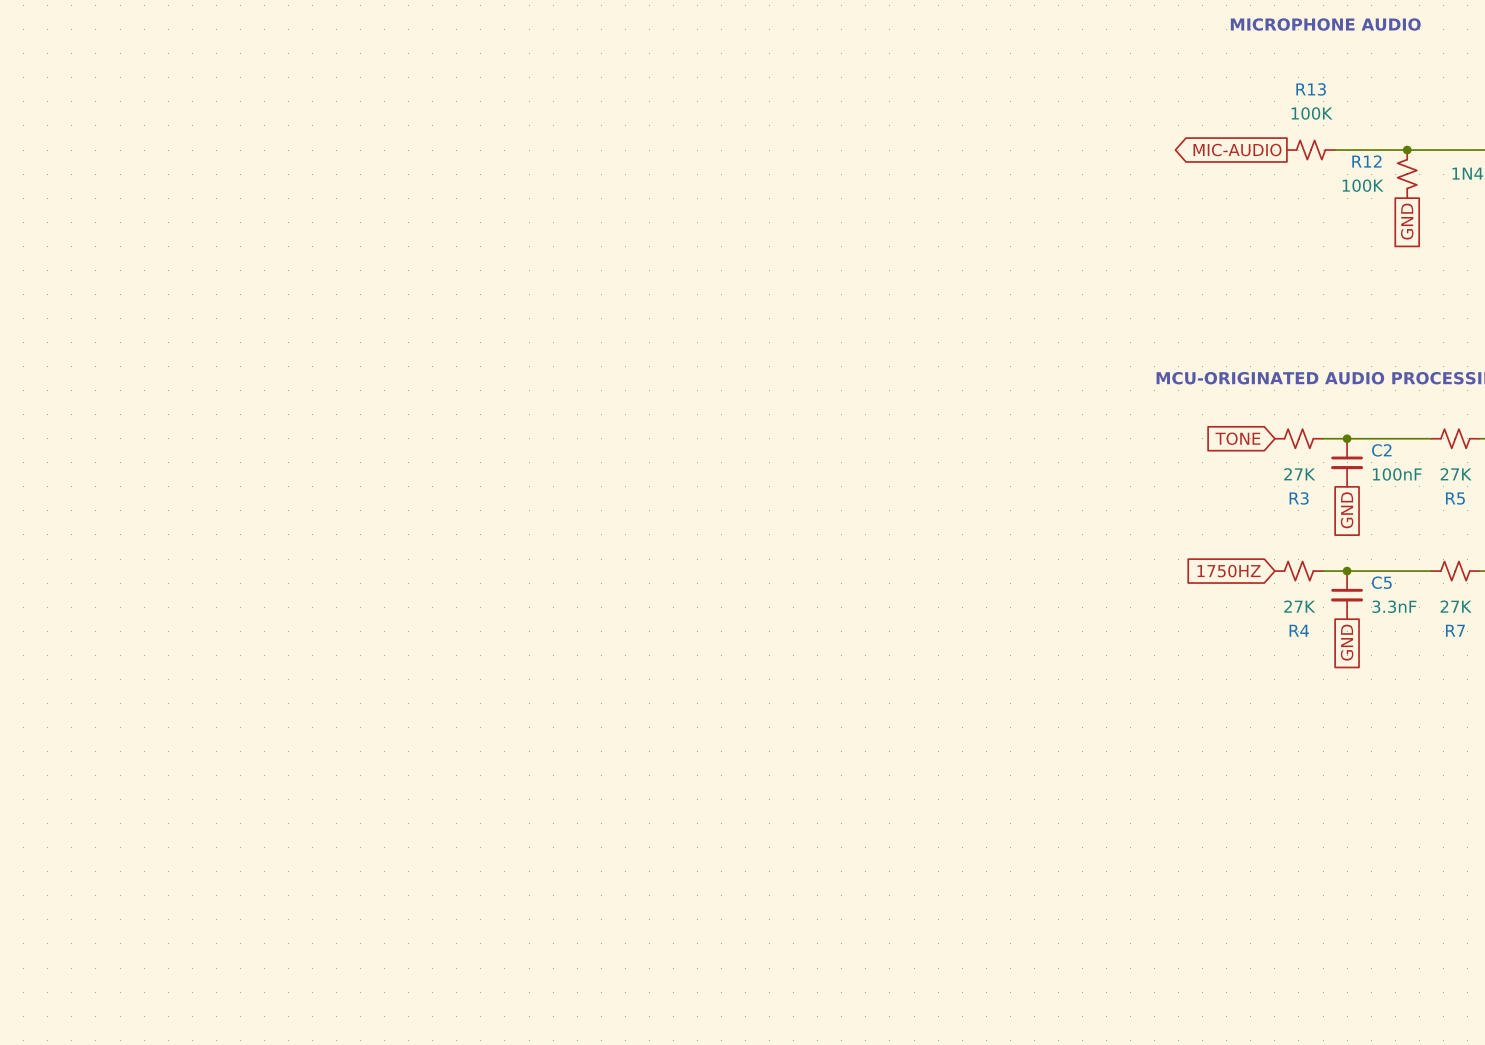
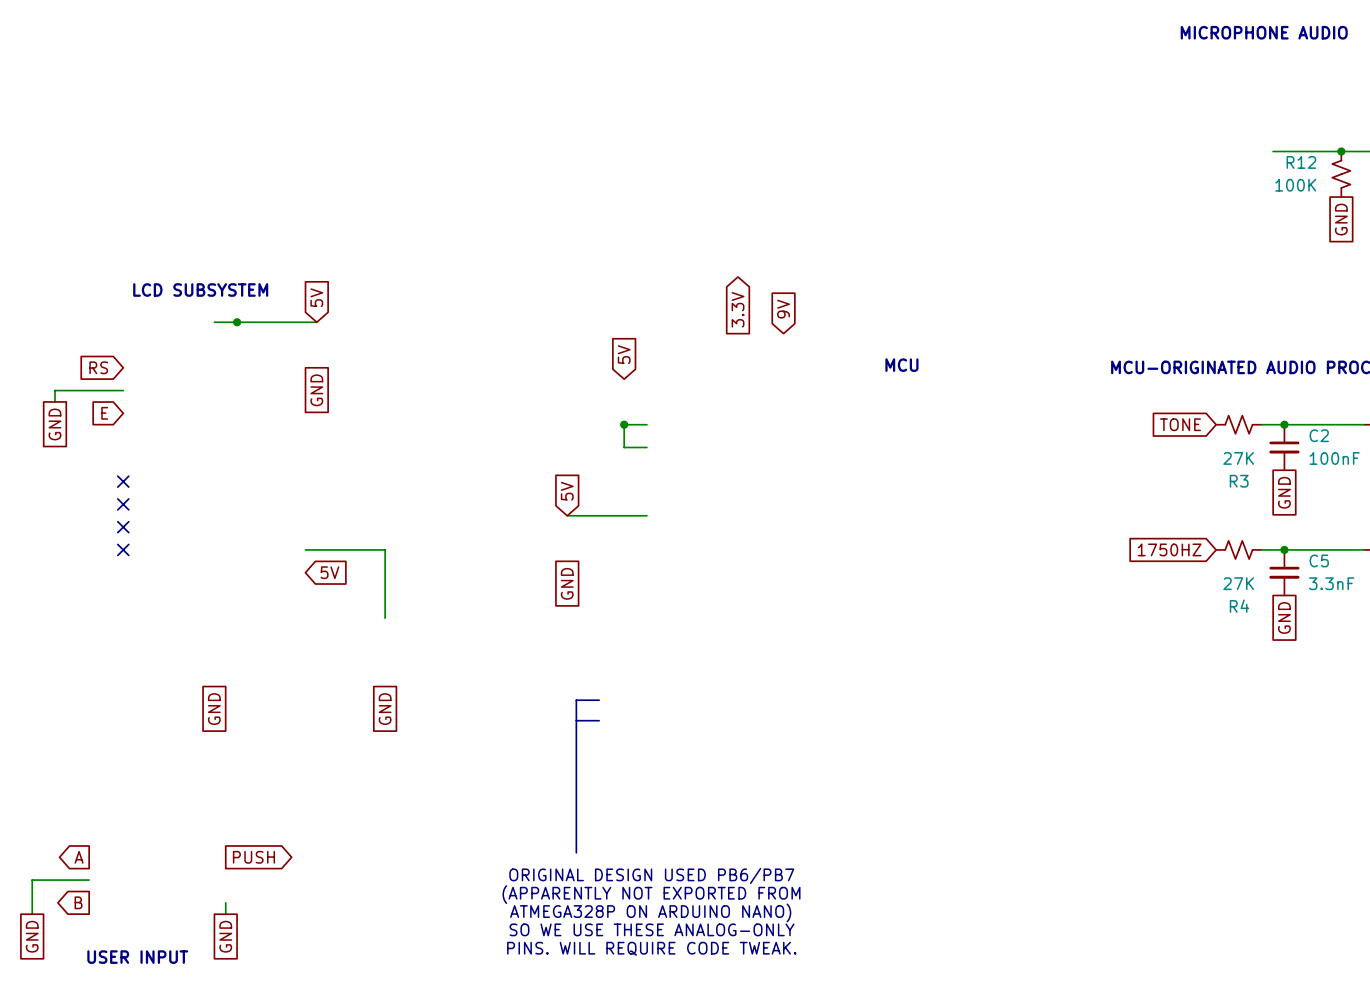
global label: MIC-AUDIO (1237, 150) -> none
R13: 100K (1310, 150) -> none
text: none -> LCD SUBSYSTEM (200, 290)
global label: none -> 5V (316, 297)
global label: none -> 9V (783, 309)
global label: none -> 3.3V (738, 309)
wire: none -> (214, 322) (316, 322)
junction: none -> (237, 322)
global label: none -> 5V (624, 354)
text: none -> MCU (901, 365)
global label: none -> RS (98, 367)
wire: none -> (123, 390) (54, 390) (54, 401)
global label: none -> GND (316, 390)
global label: none -> E (104, 413)
global label: none -> GND (54, 424)
junction: none -> (624, 424)
wire: none -> (646, 424) (624, 424) (624, 447) (646, 447)
no-connect mark: none -> (123, 481)
global label: none -> 5V (567, 491)
no-connect mark: none -> (123, 504)
wire: none -> (567, 515) (646, 515)
no-connect mark: none -> (123, 527)
no-connect mark: none -> (123, 549)
wire: none -> (305, 549) (385, 549) (385, 618)
global label: none -> 5V (329, 572)
global label: none -> GND (567, 583)
line: none -> (599, 700) (576, 700) (576, 852)
global label: none -> GND (214, 709)
global label: none -> GND (385, 709)
line: none -> (576, 720) (599, 720)
global label: none -> A (79, 857)
global label: none -> PUSH (253, 857)
text: none -> ORIGINAL DESIGN USED PB6/PB7 (651, 875)
wire: none -> (89, 880) (32, 880) (32, 914)
text: none -> (APPARENTLY NOT EXPORTED FROM (651, 894)
global label: none -> B (78, 902)
wire: none -> (225, 902) (225, 914)
text: none -> ATMEGA328P ON ARDUINO NANO) (650, 912)
text: none -> SO WE USE THESE ANALOG-ONLY (652, 929)
global label: none -> GND (32, 936)
global label: none -> GND (225, 936)
text: none -> PINS. WILL REQUIRE CODE TWEAK. (651, 948)
text: none -> USER INPUT (137, 957)

